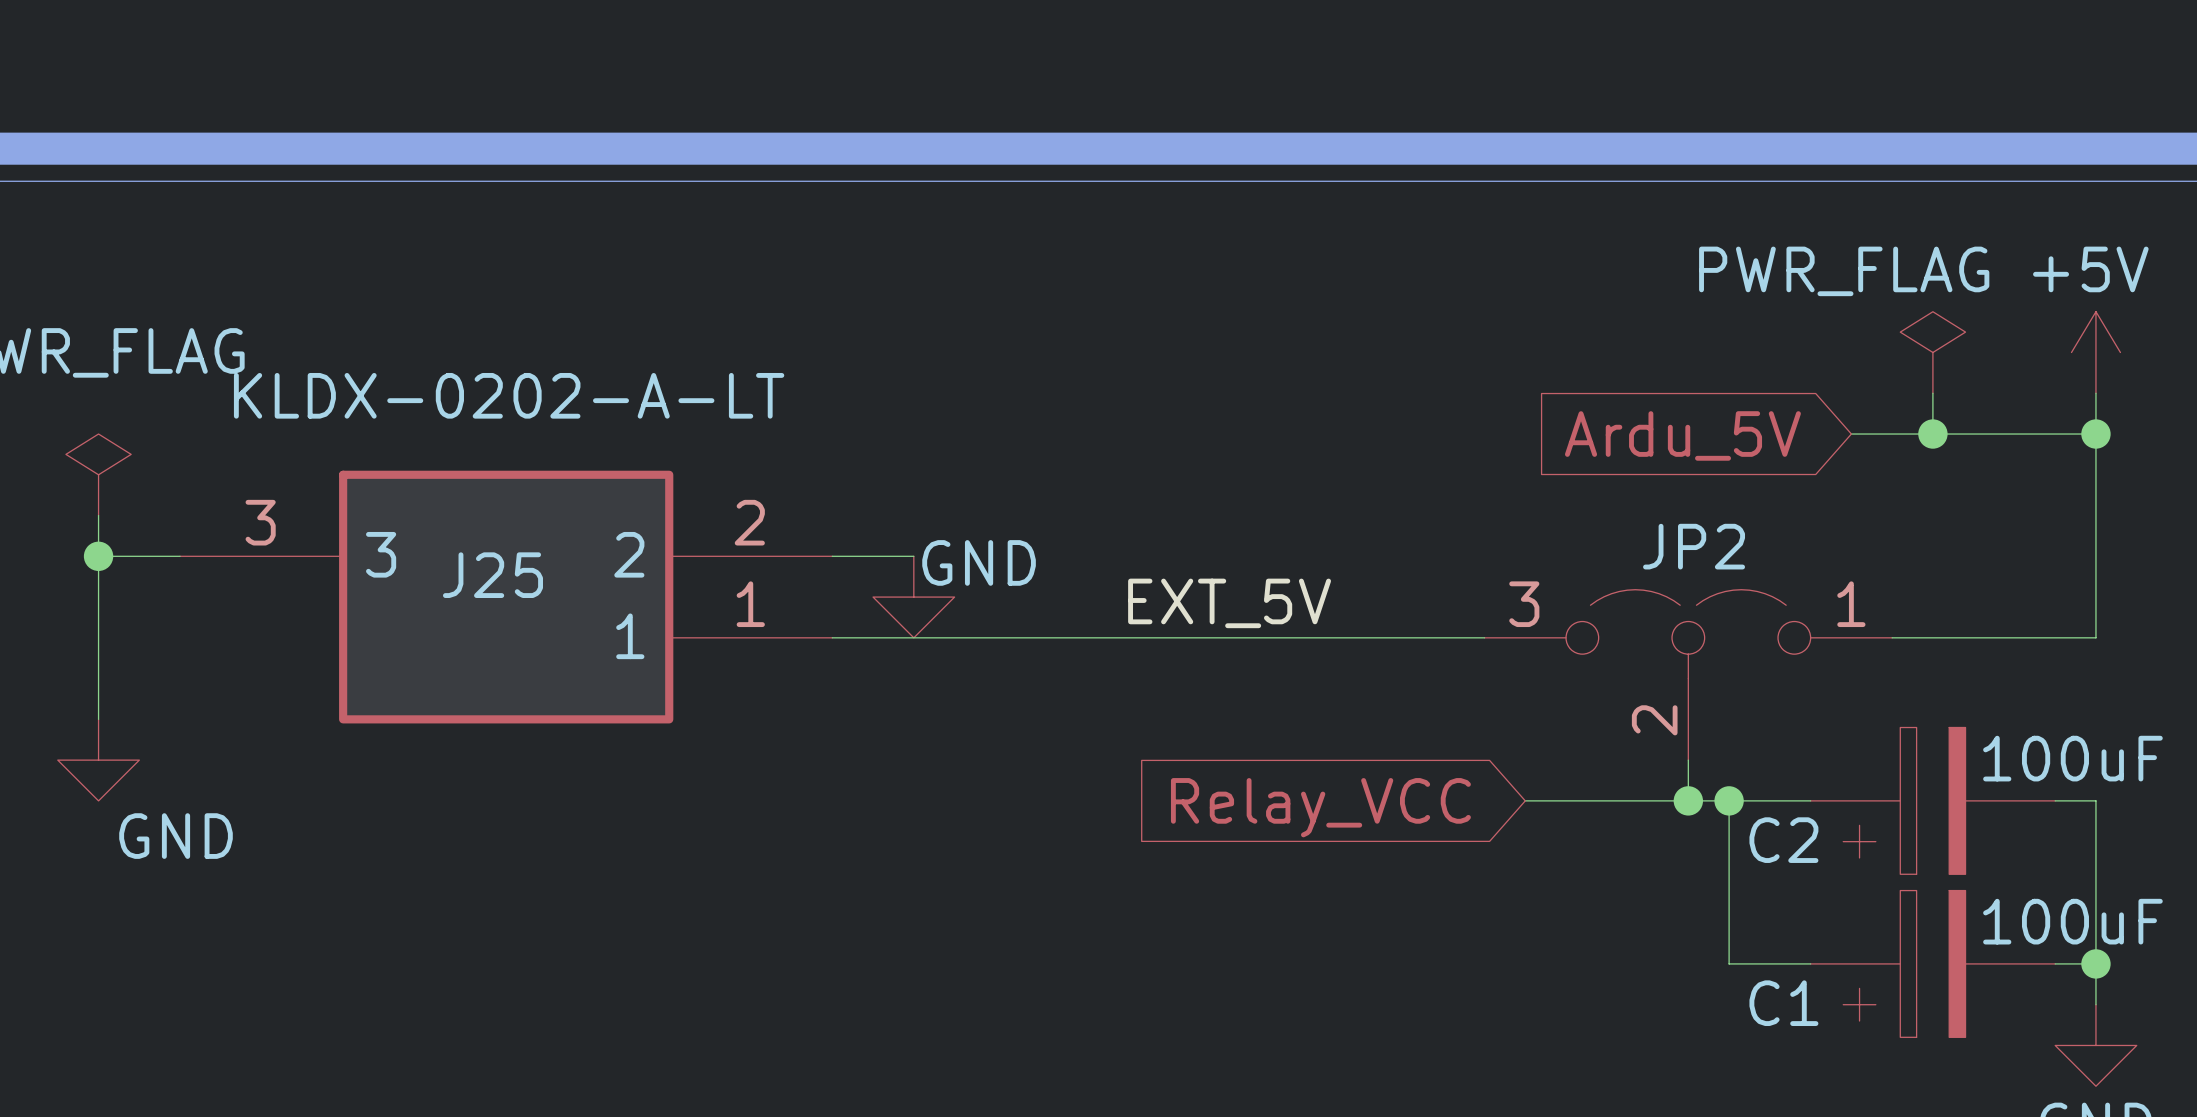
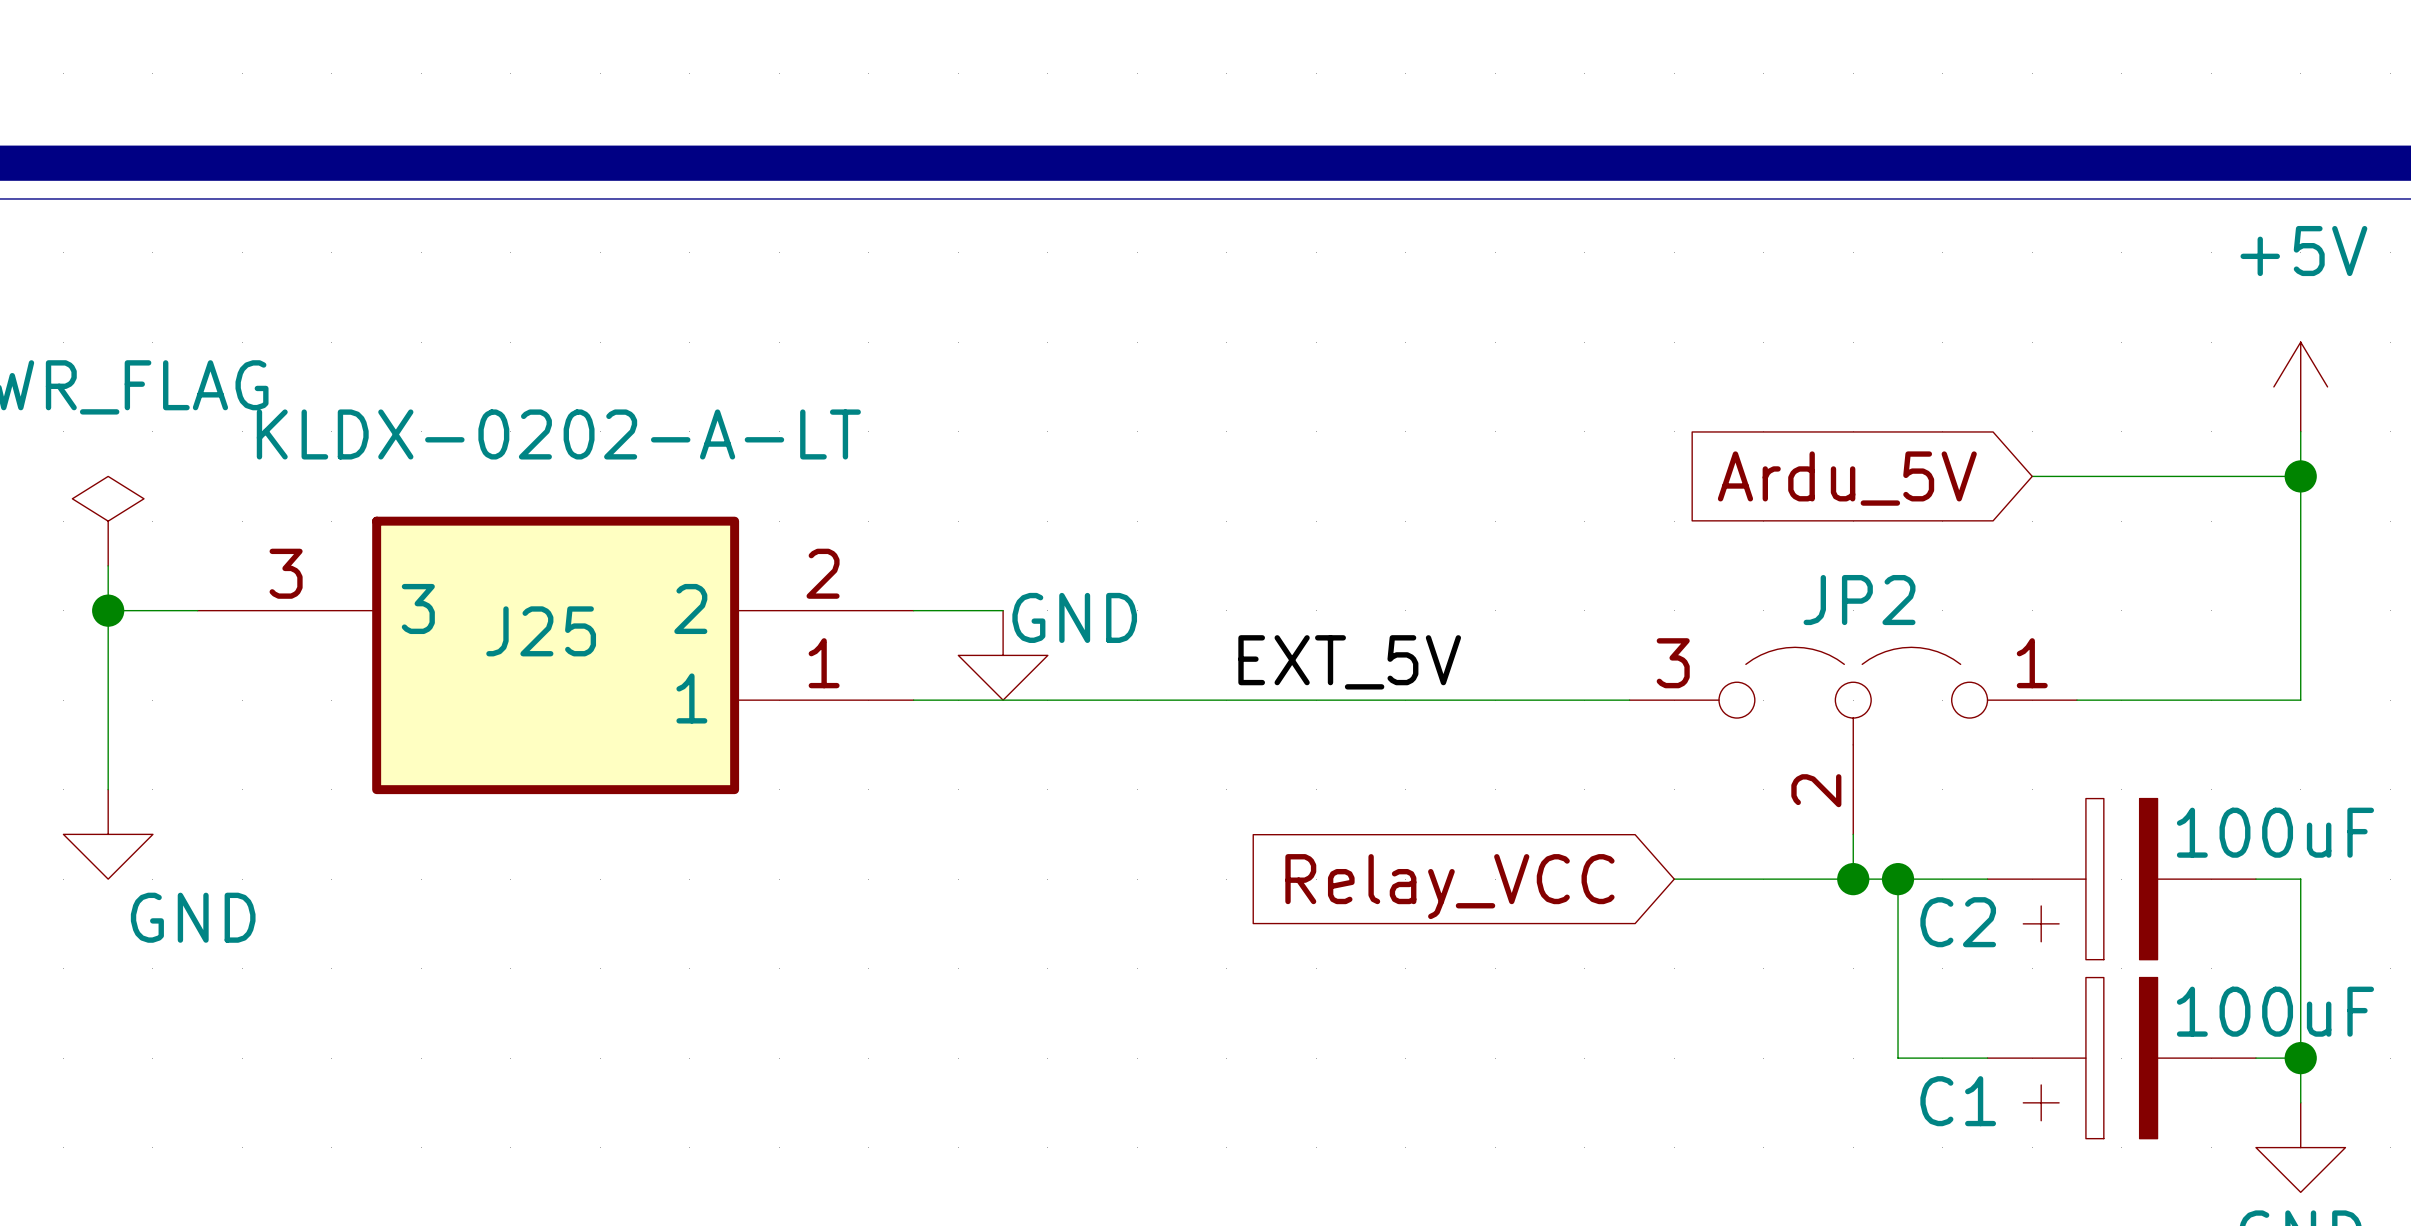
power symbol text position: +5V (2090, 269) -> +5V (2303, 251)
power symbol: PWR_FLAG (1932, 352) -> none
wire: (1932, 393) (1932, 434) -> none
junction: (1932, 434) -> none

